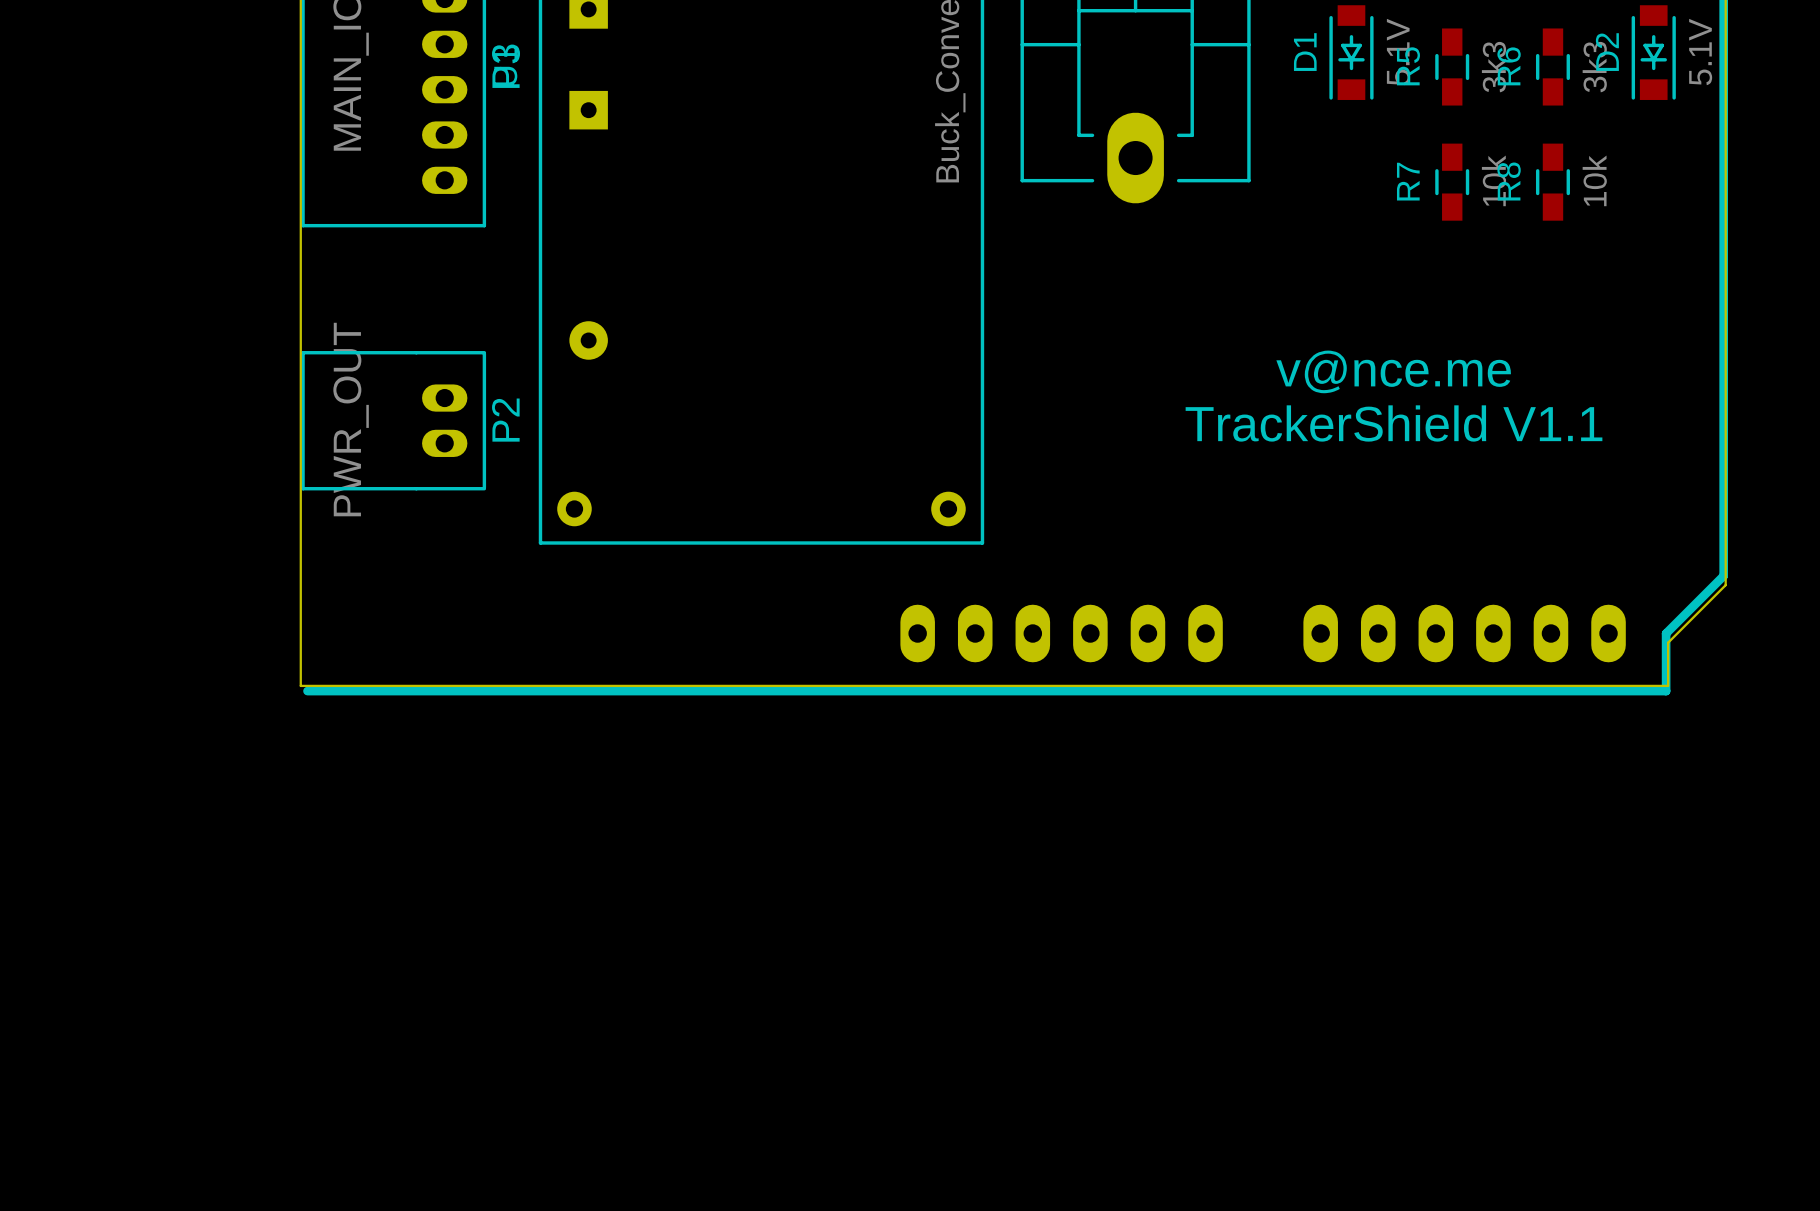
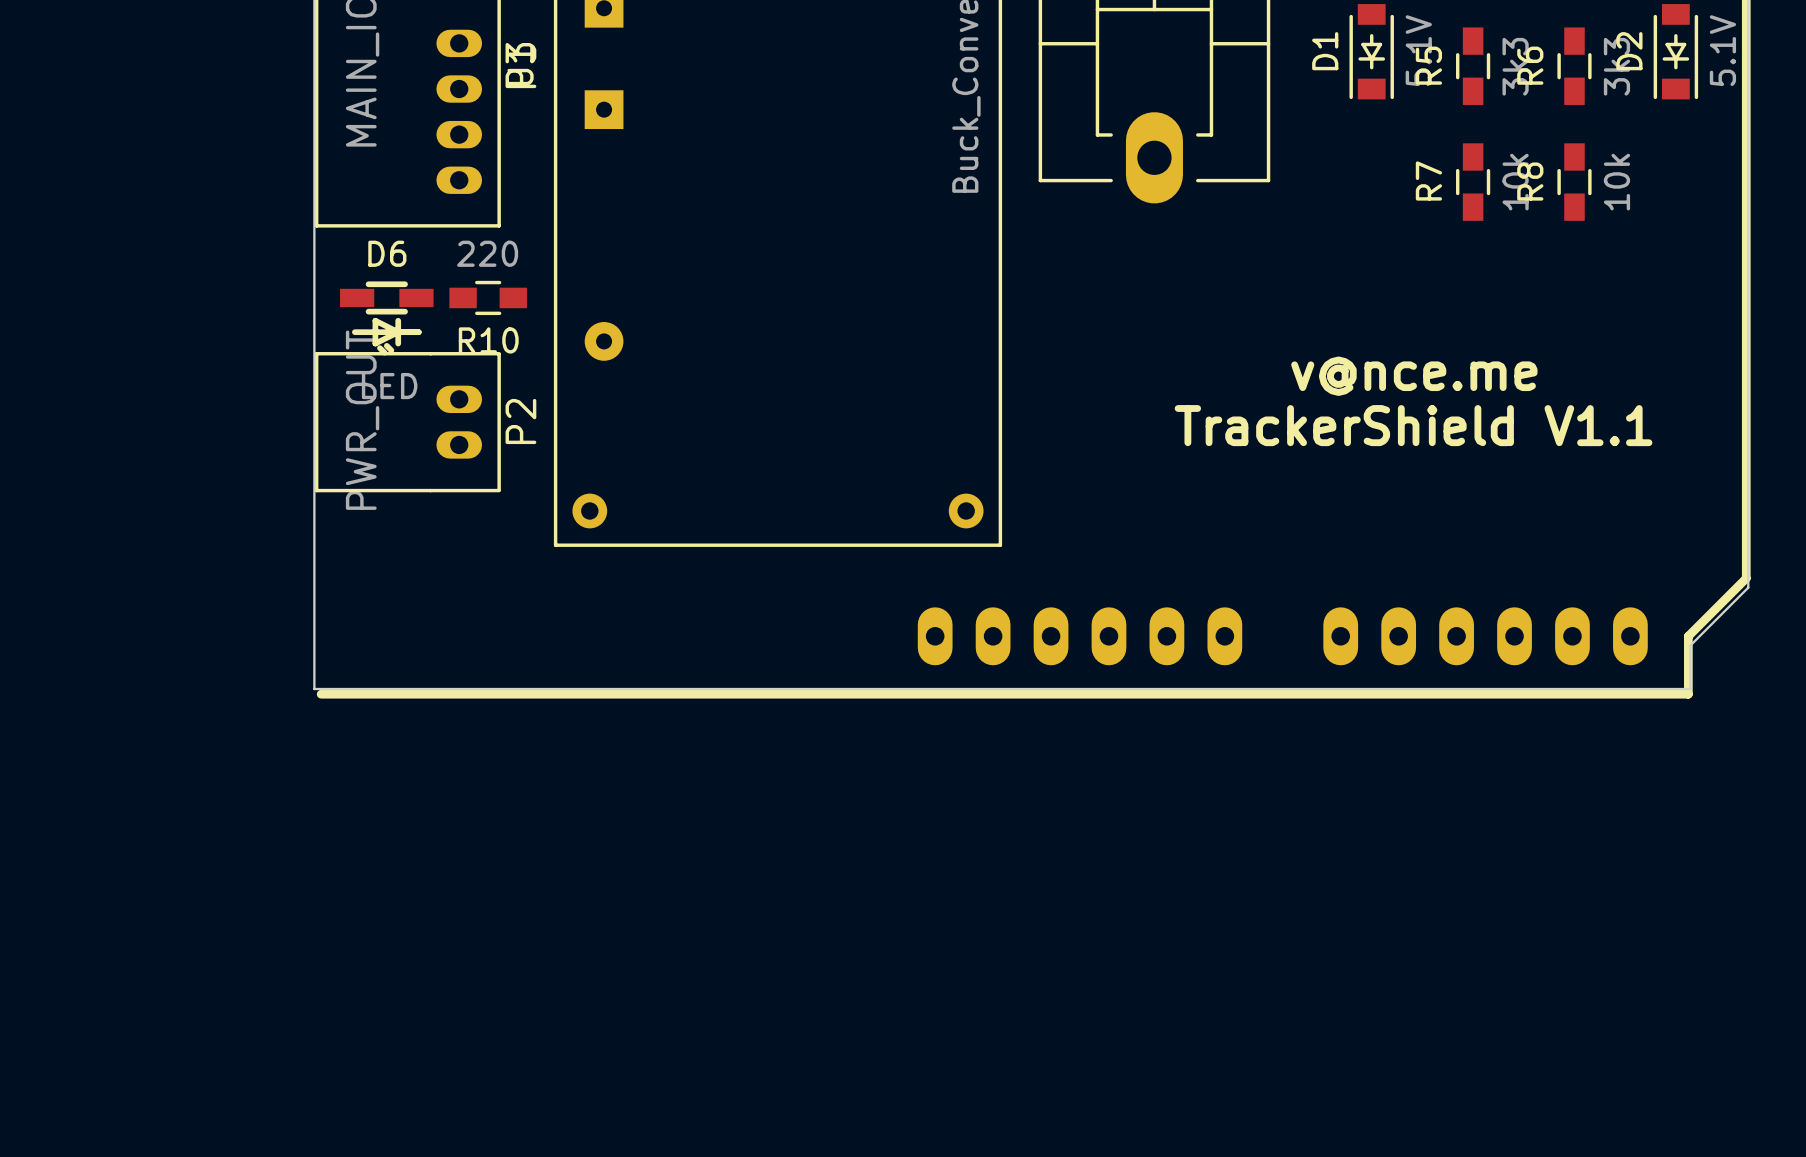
R10: none -> 220 (488, 297)
D6: none -> LED (386, 318)

